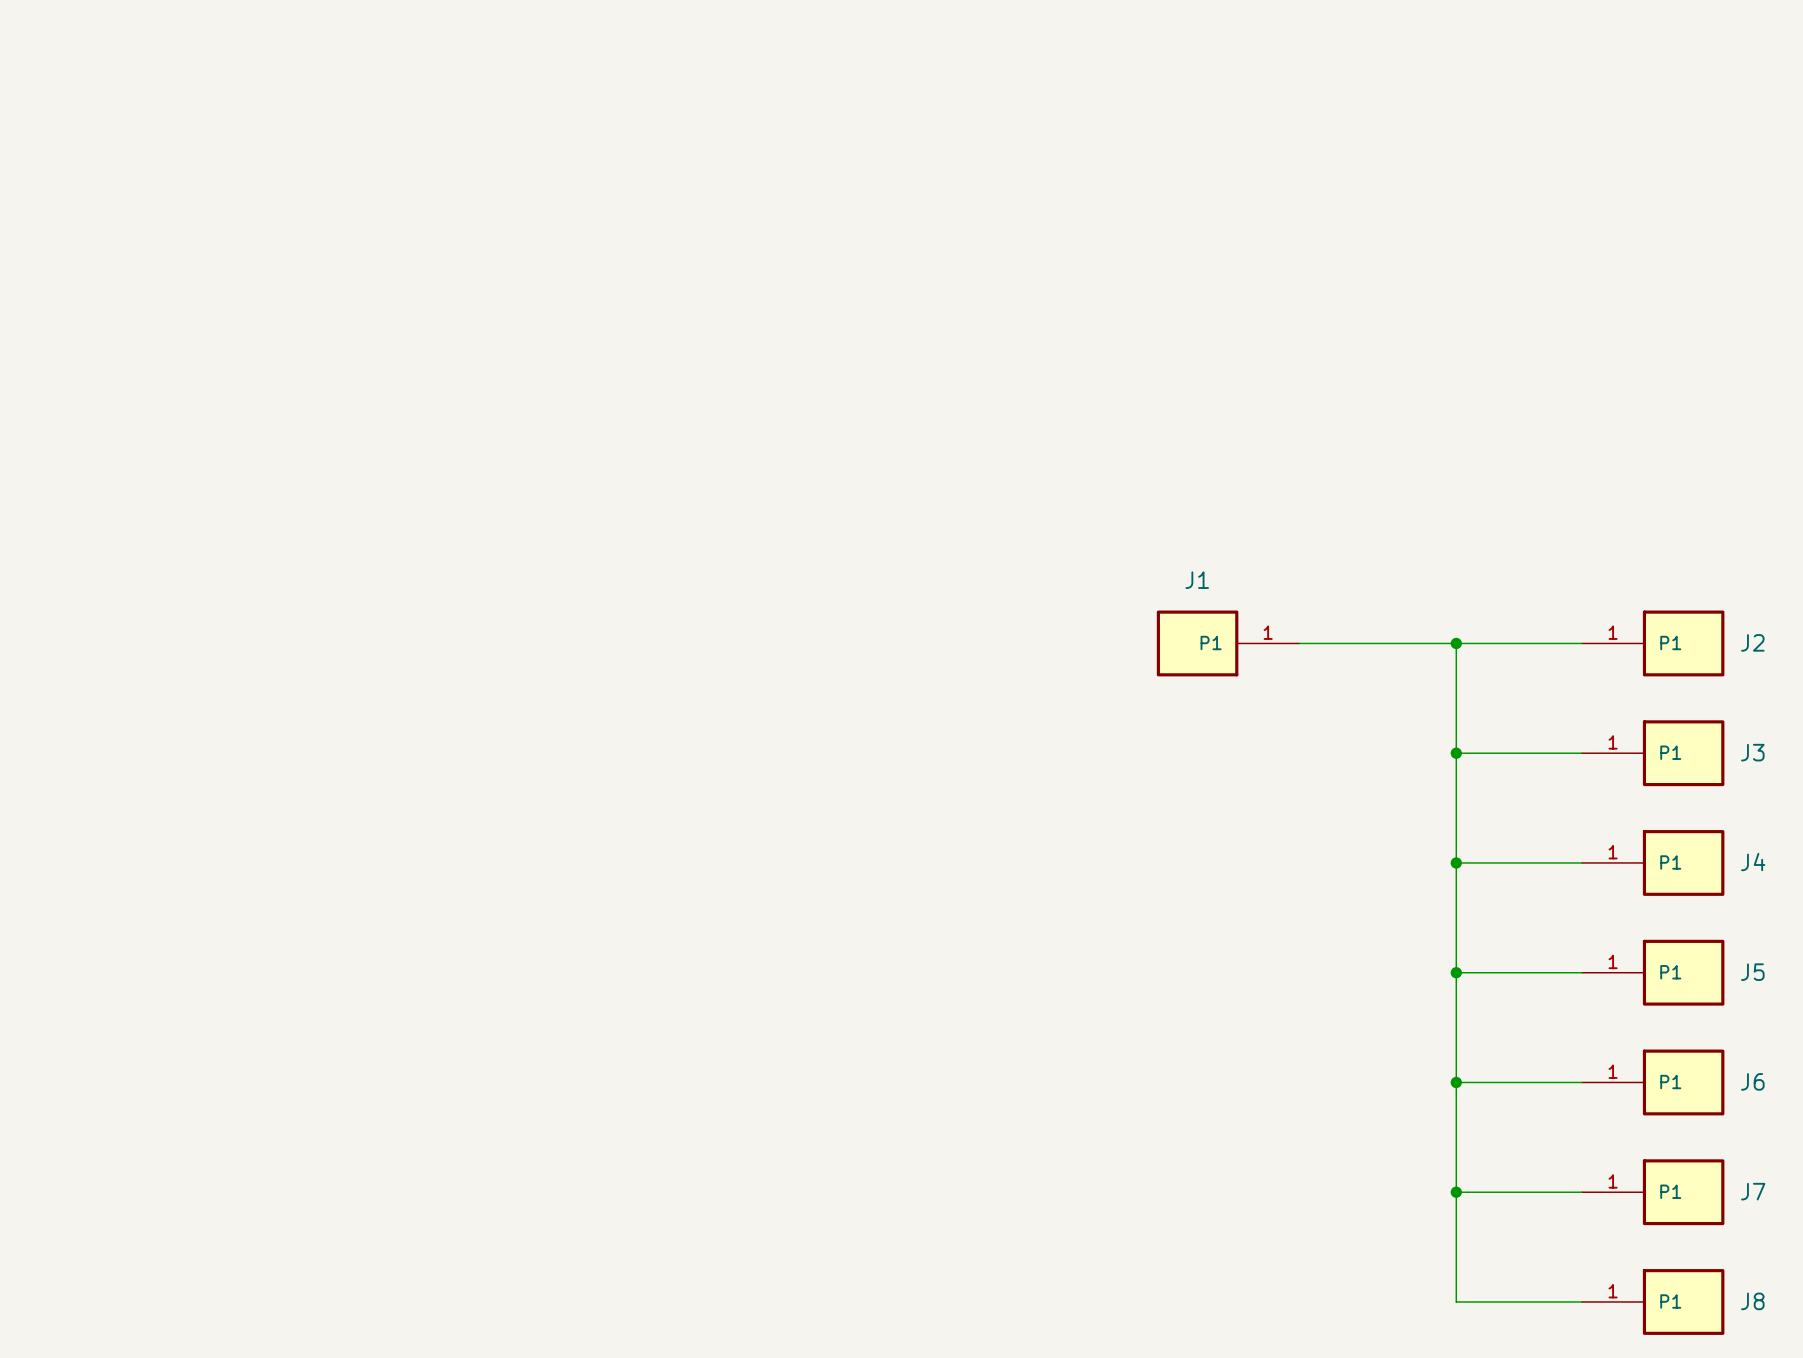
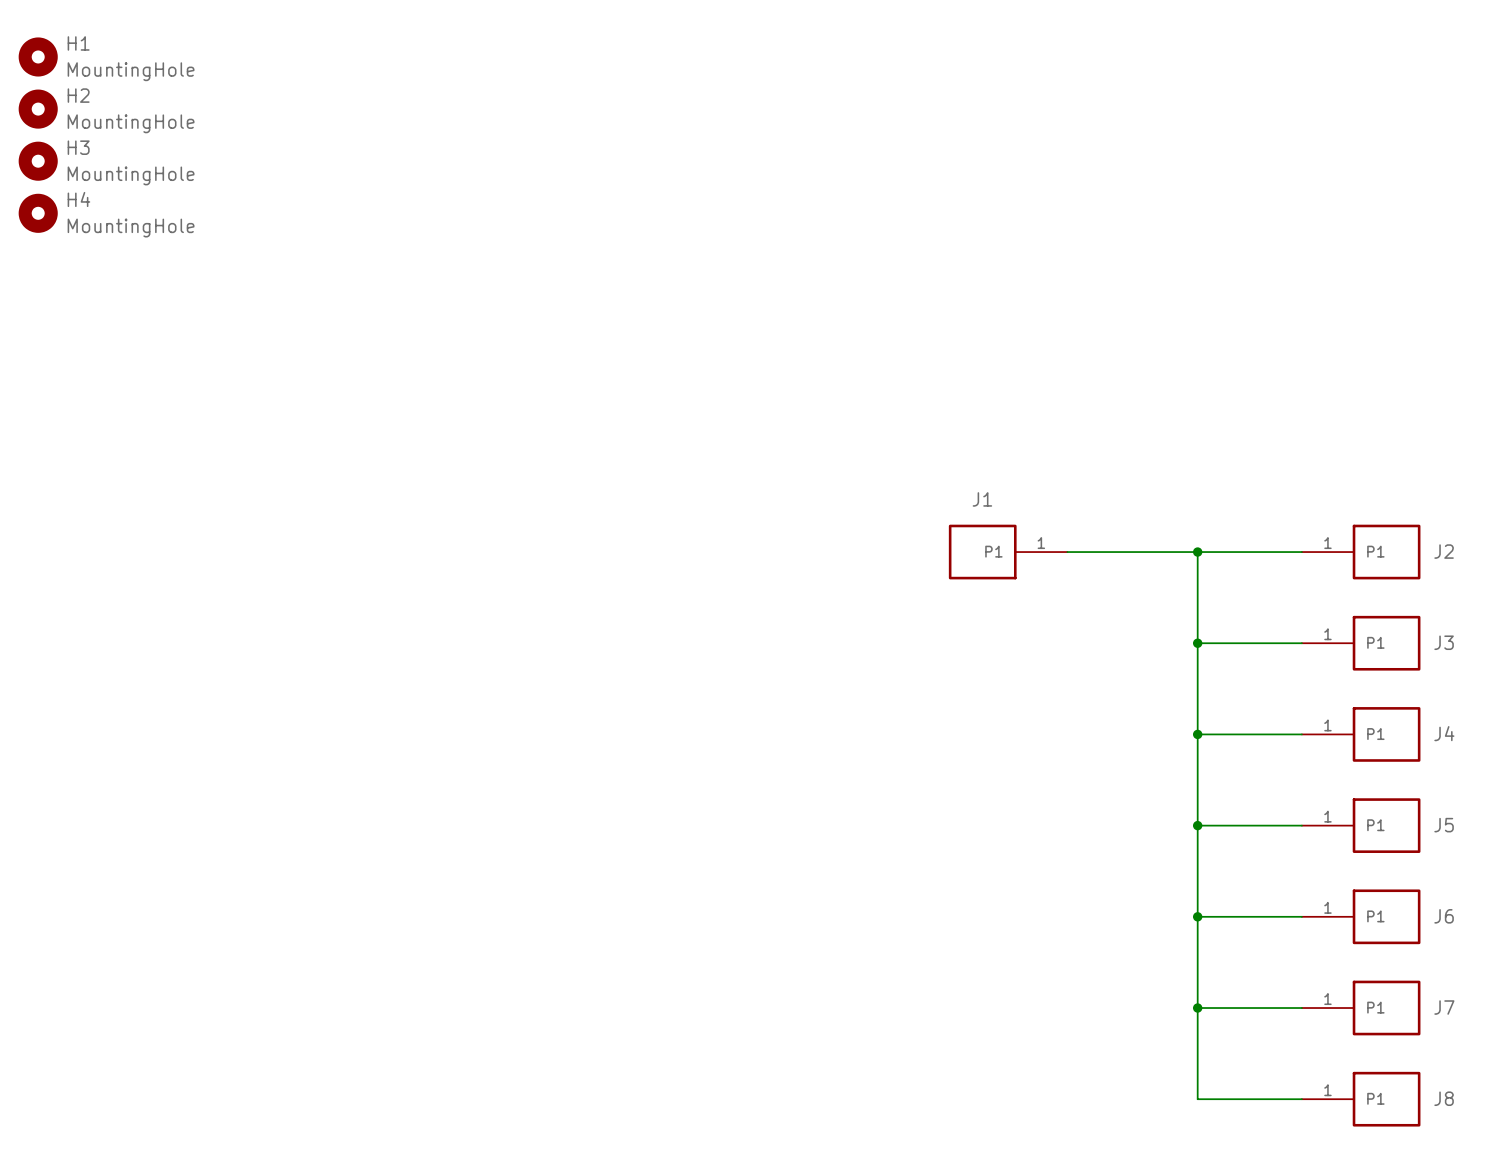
H1: none -> MountingHole (38, 56)
H2: none -> MountingHole (38, 109)
H3: none -> MountingHole (38, 161)
H4: none -> MountingHole (38, 213)

